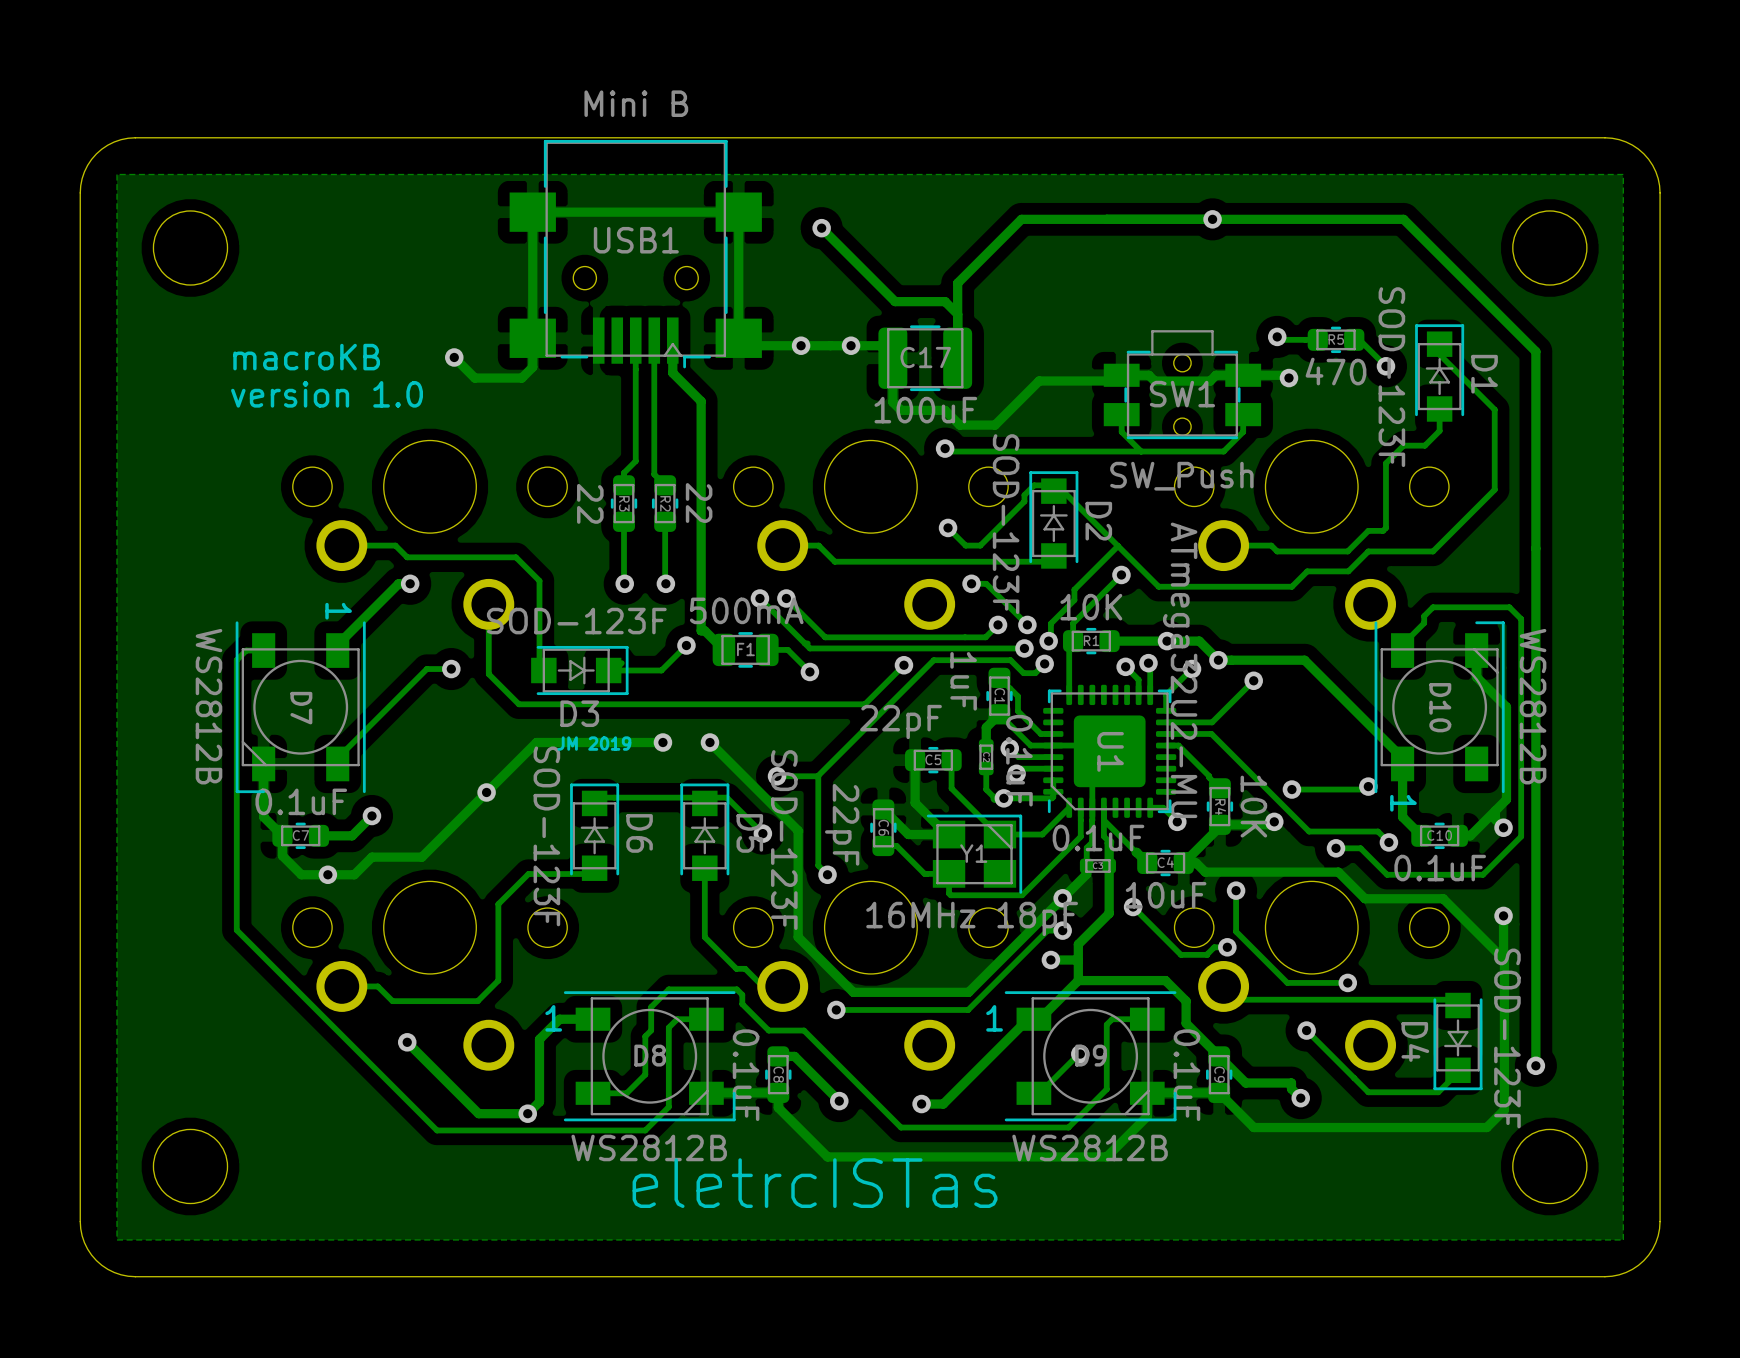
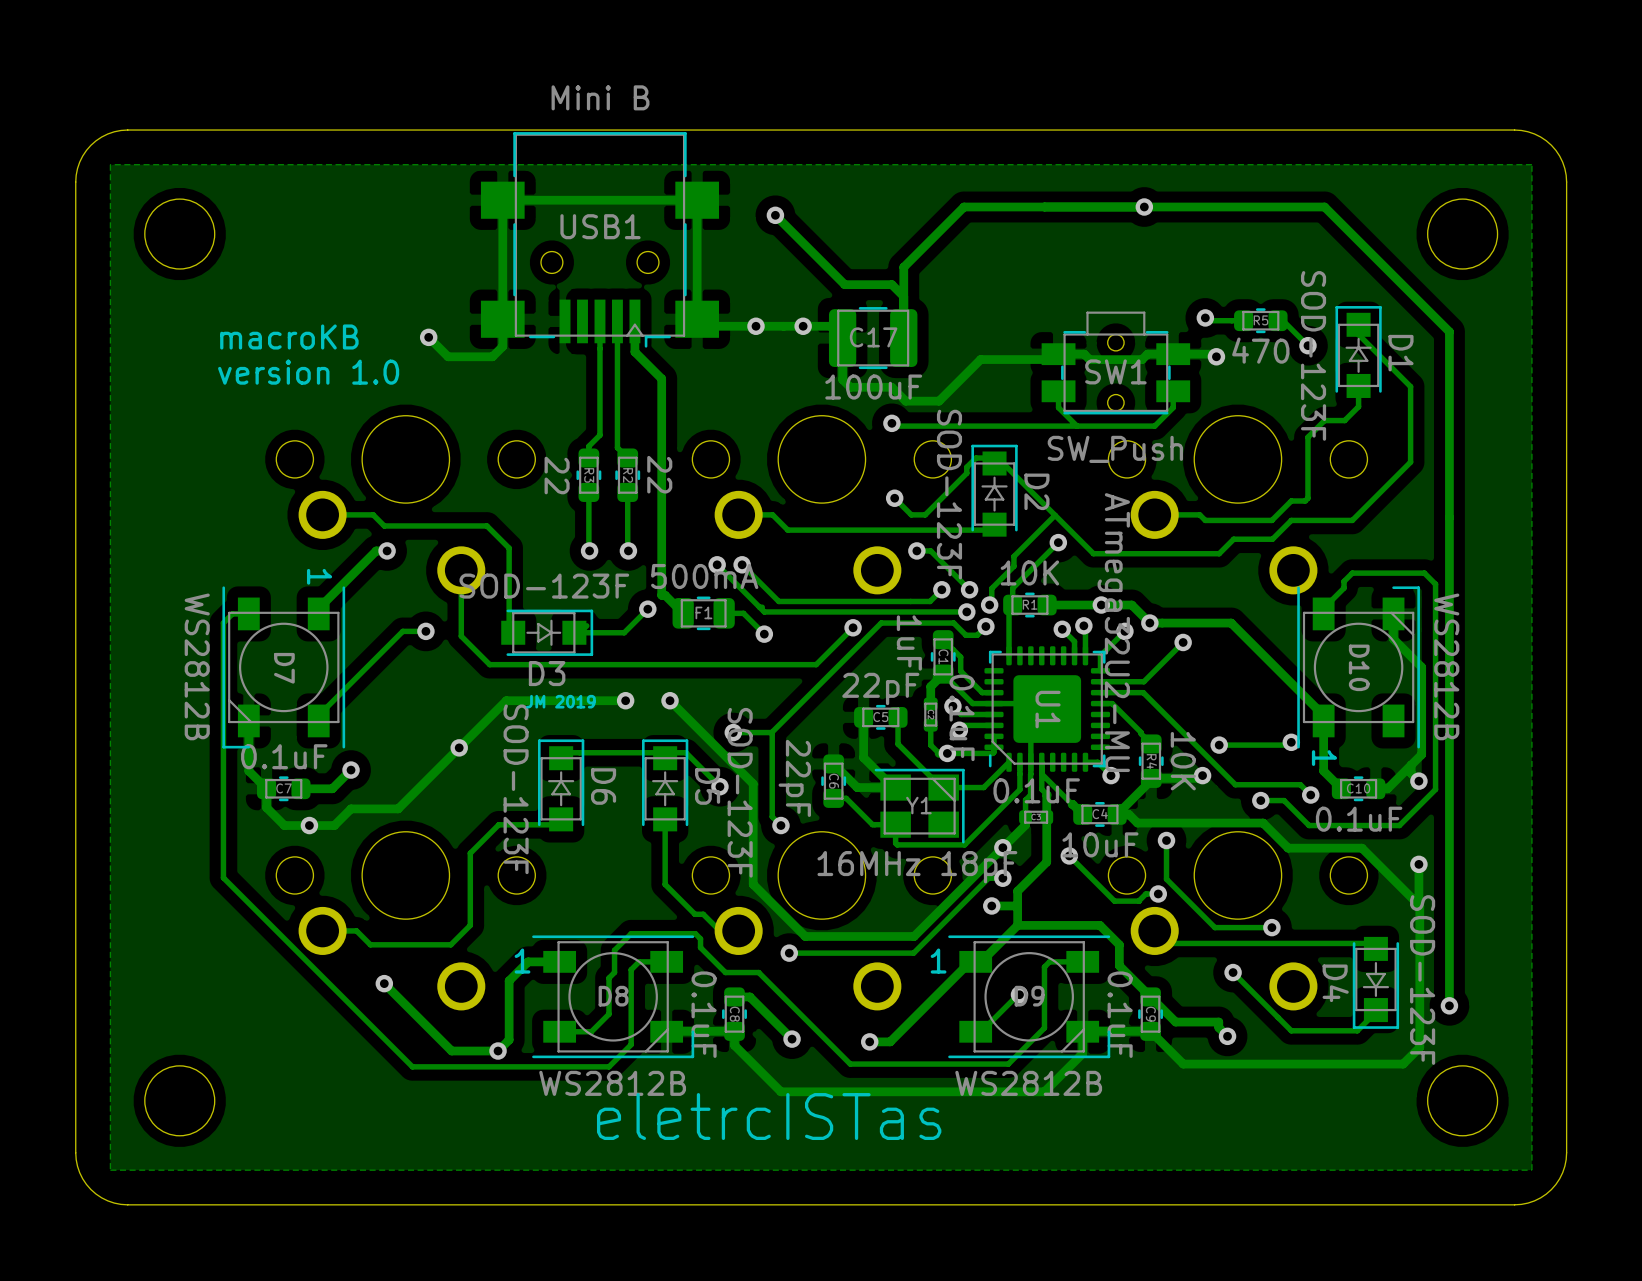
C5 value position: 22pF (901, 721) -> 22pF (880, 688)

